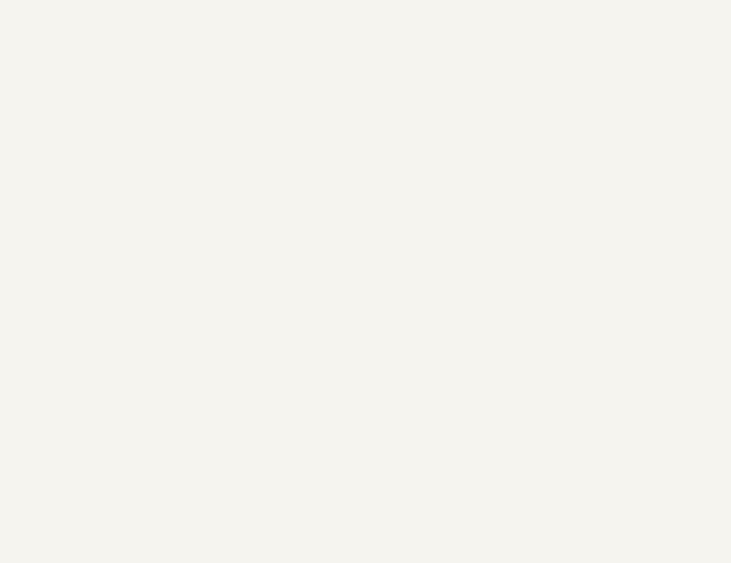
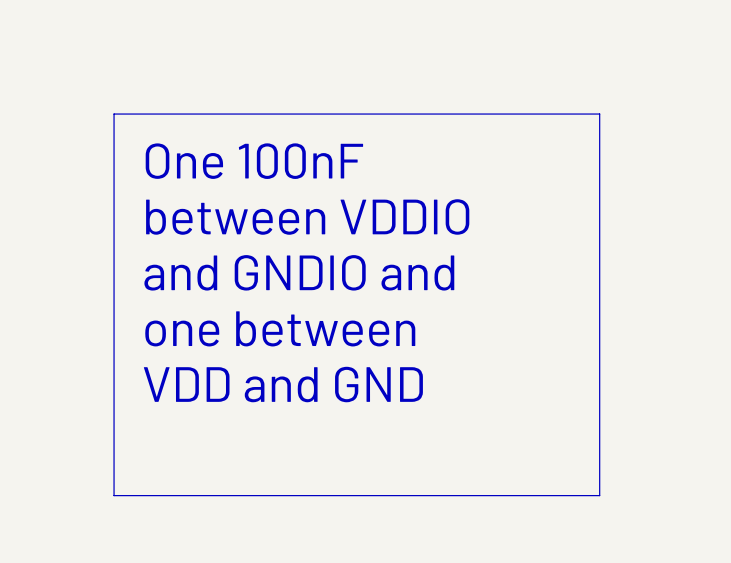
line: none -> (114, 114) (599, 114) (599, 495) (114, 495) (114, 114)
text: none -> One 100nF (254, 161)
text: none -> between VDDIO (307, 217)
text: none -> and GNDIO and (299, 272)
text: none -> one between (280, 328)
text: none -> VDD and GND (283, 384)

